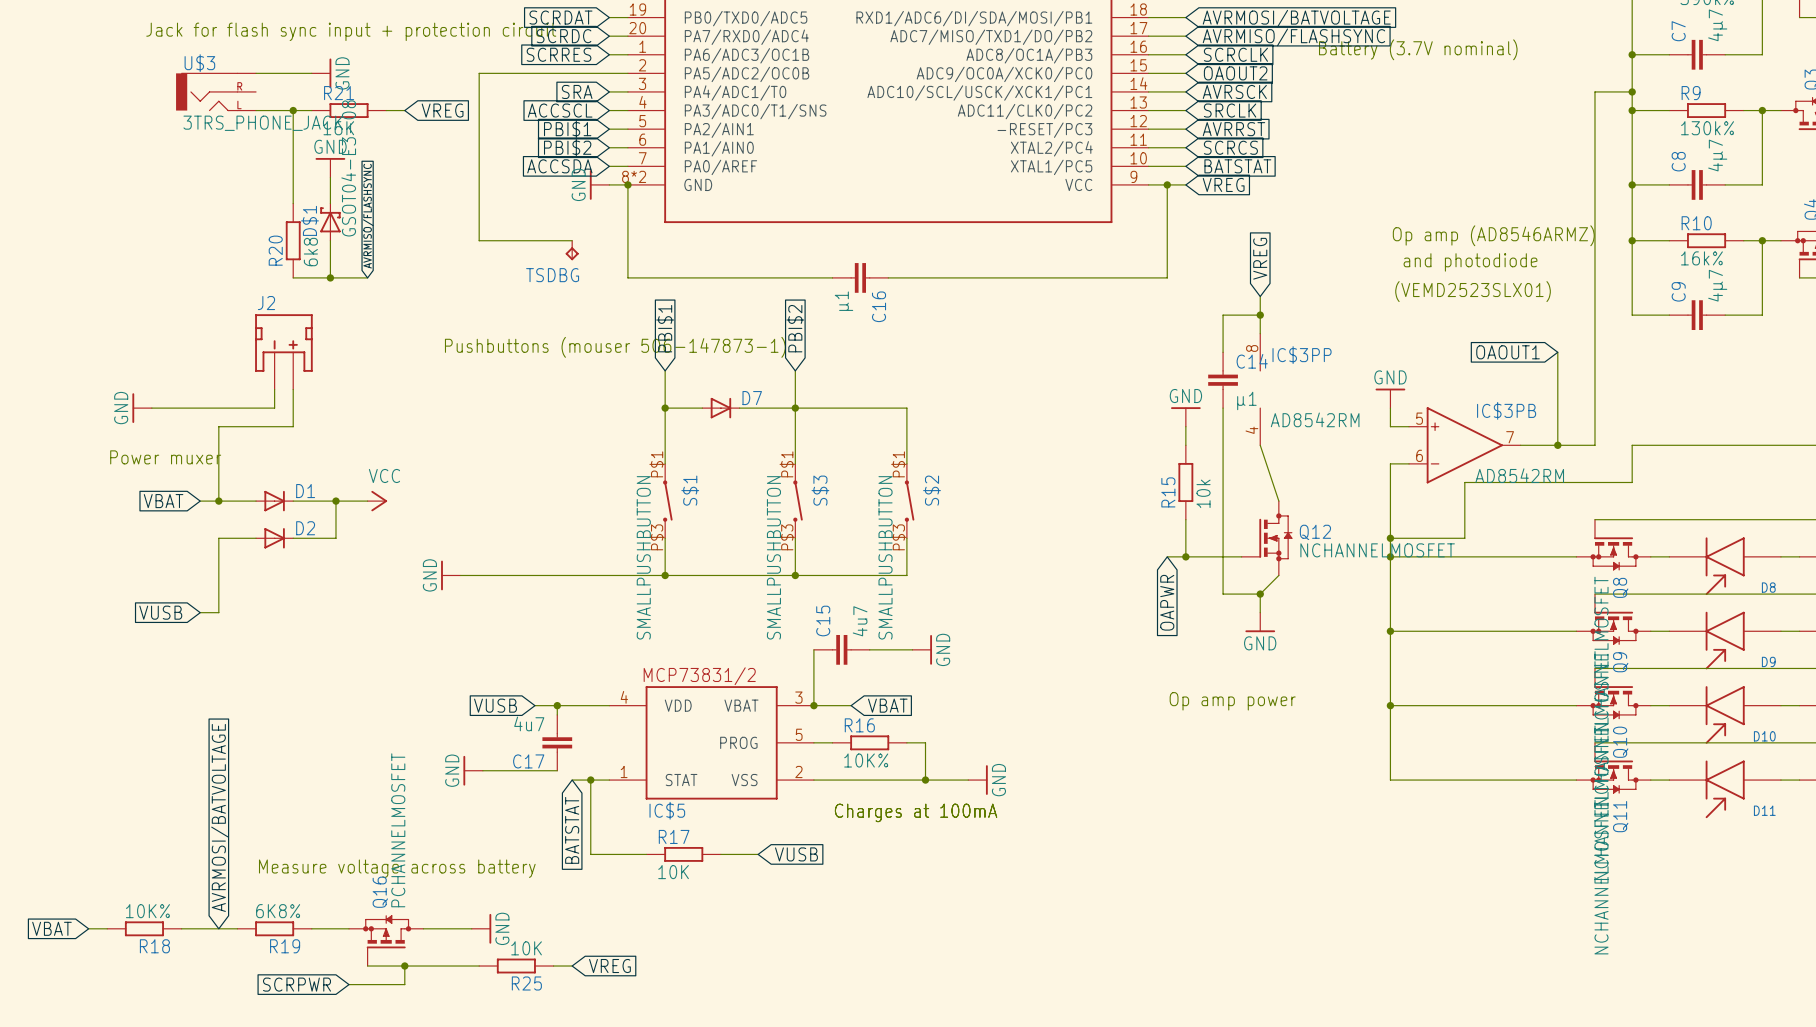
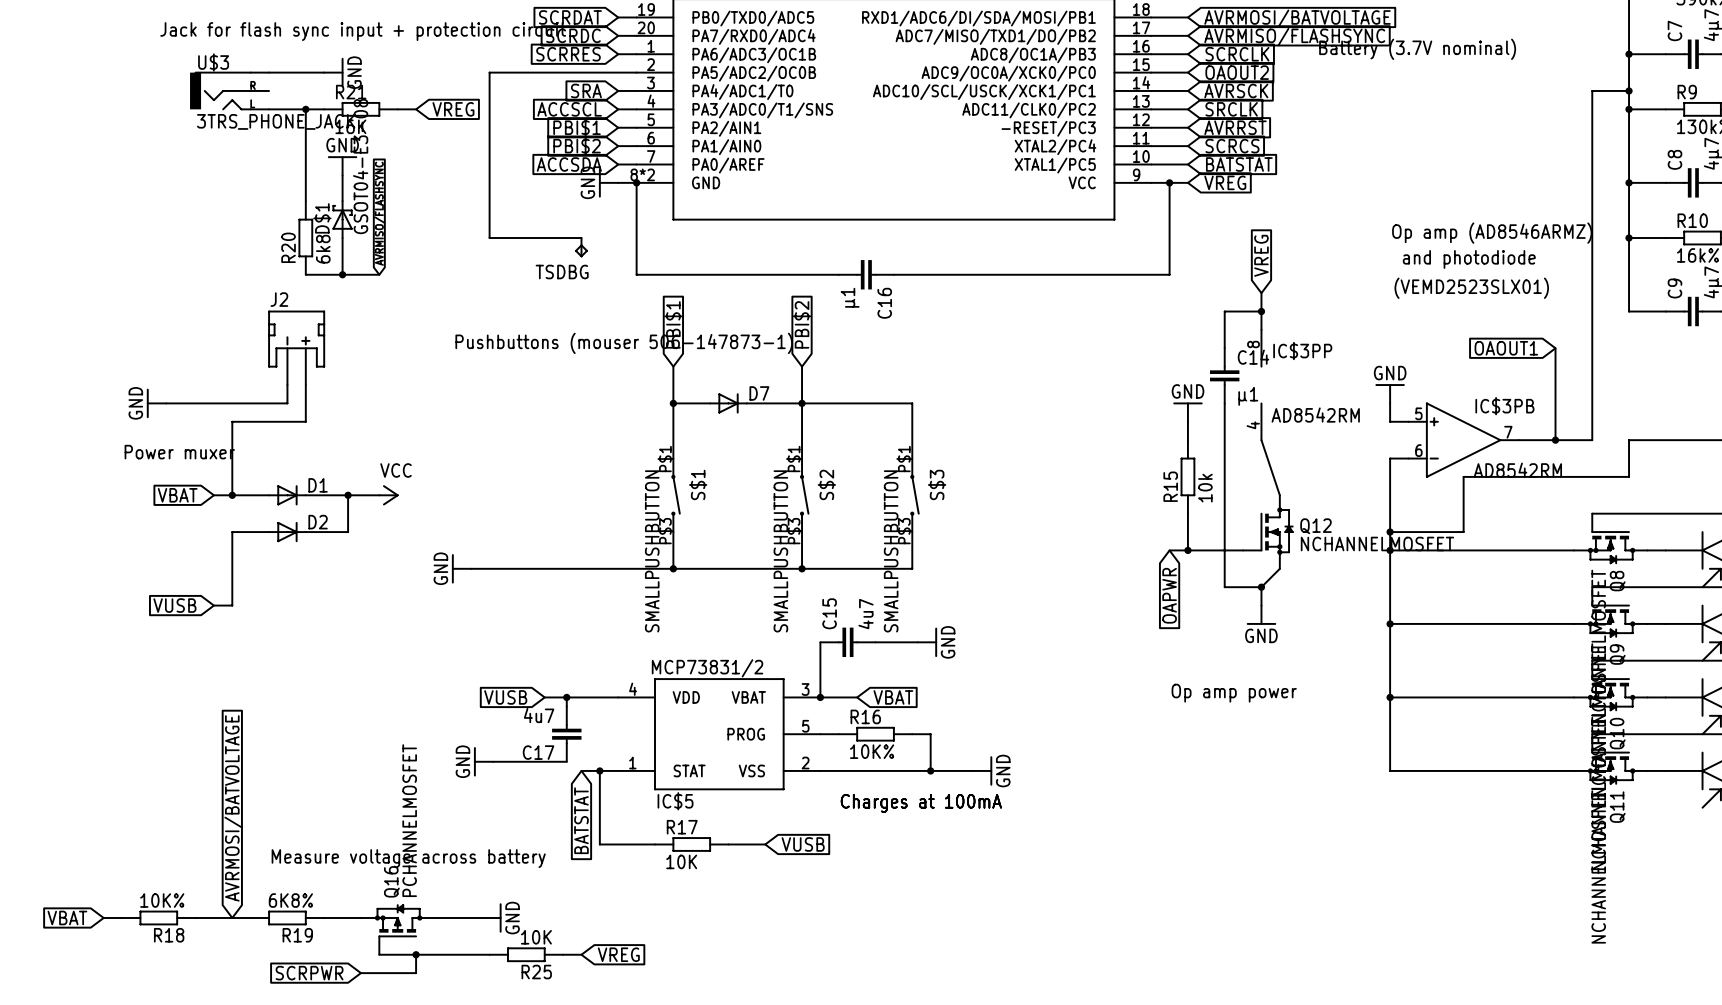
S$3 name: S$3 (820, 490) -> S$2 (826, 484)
S$2 name: S$2 (932, 490) -> S$3 (937, 484)

